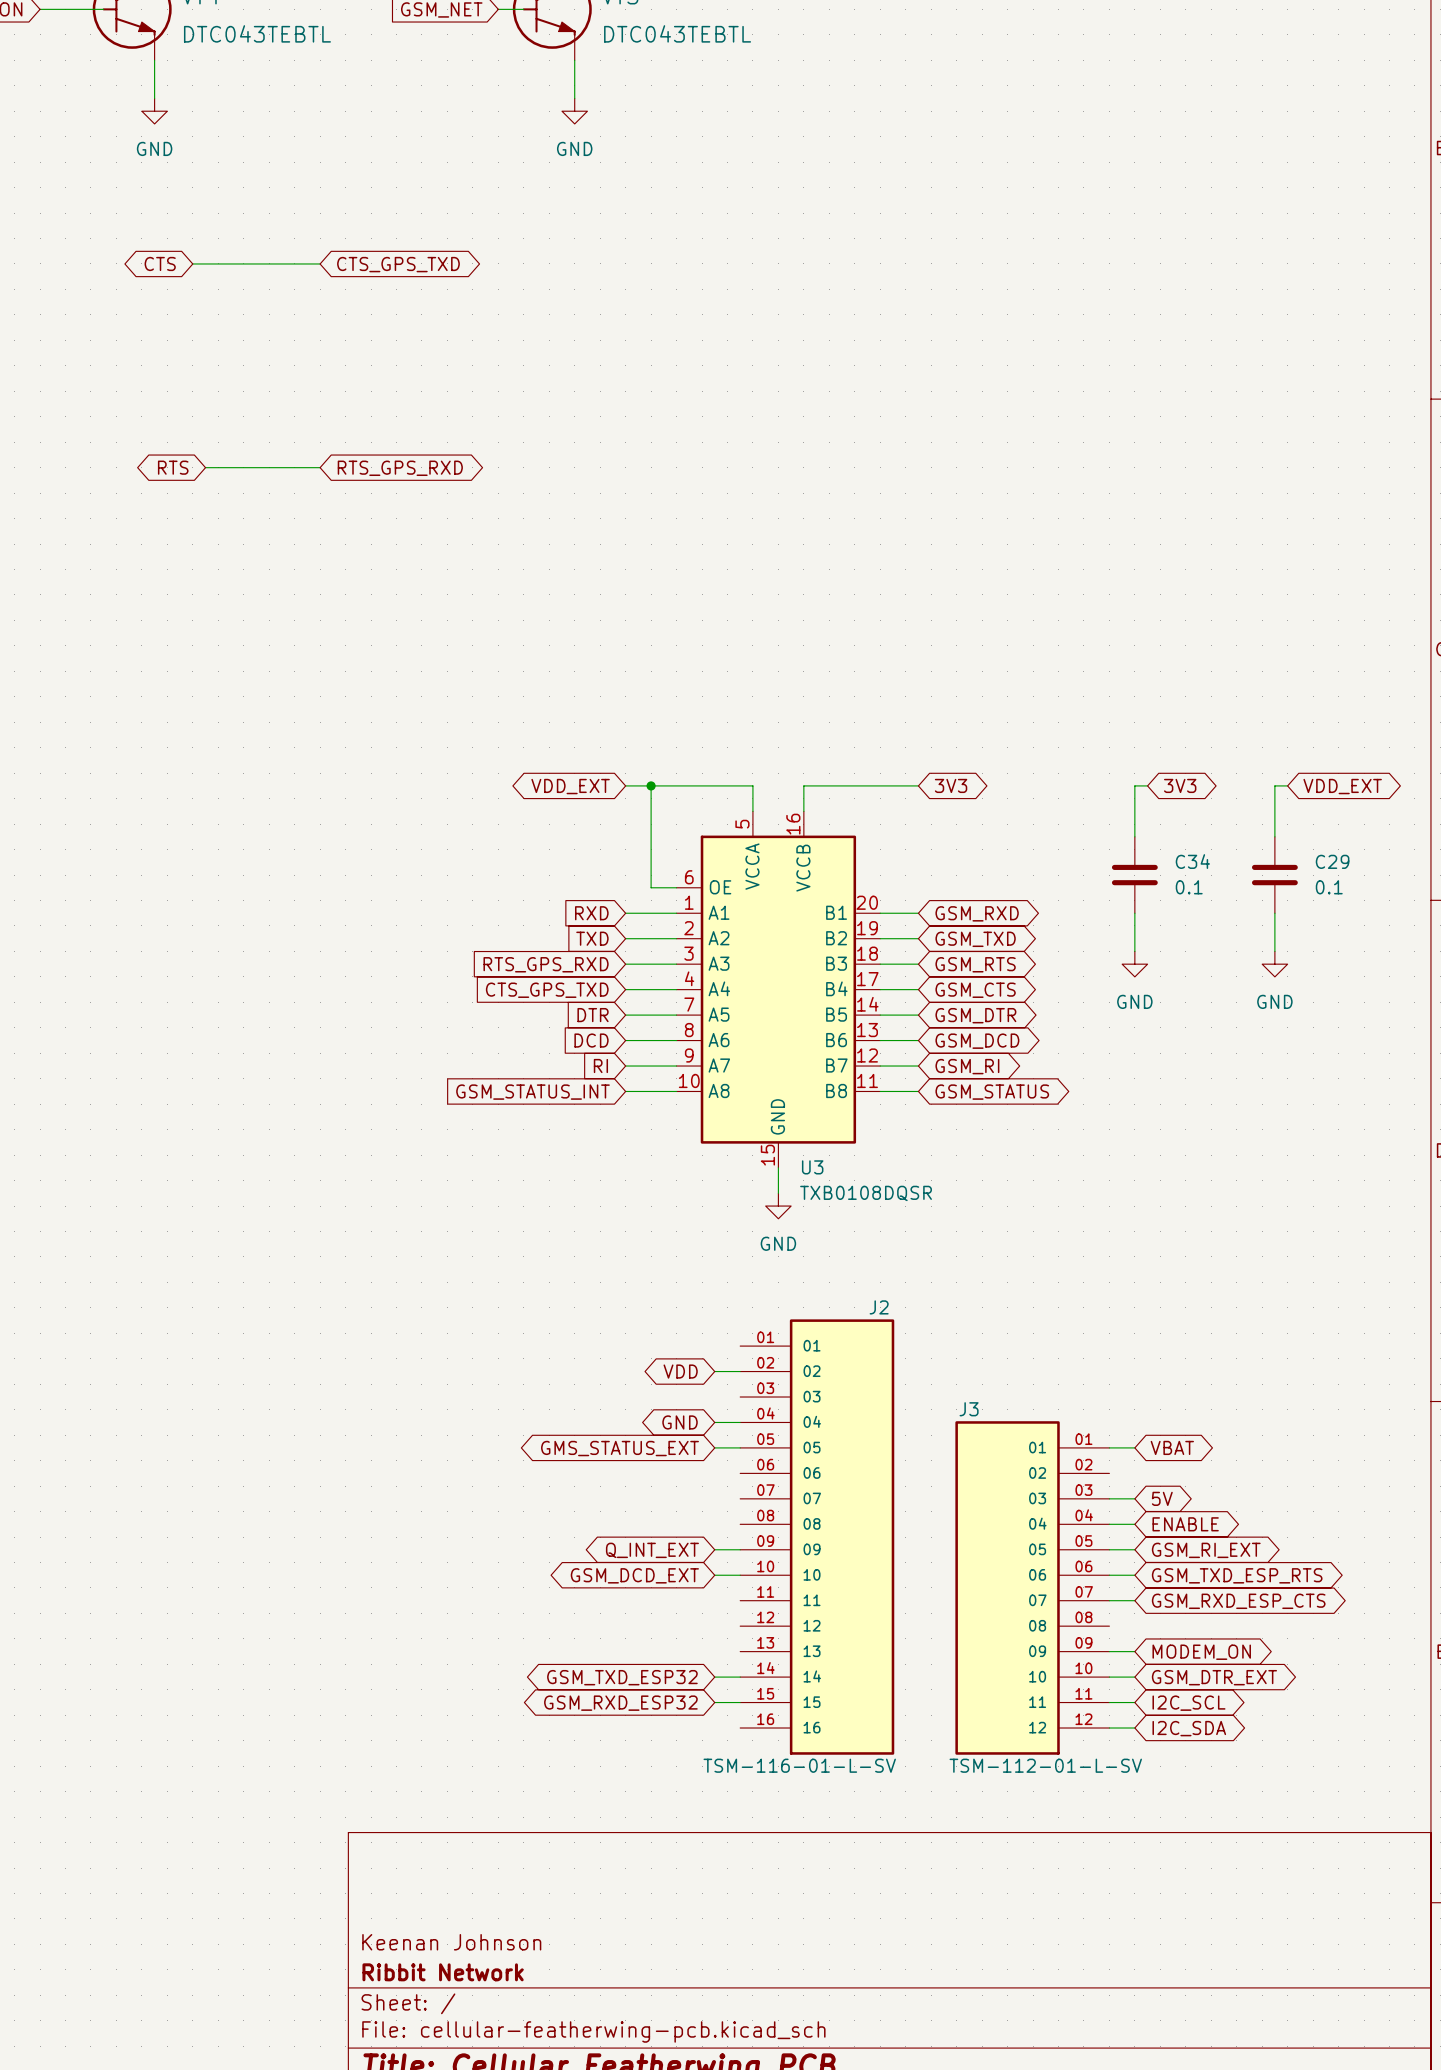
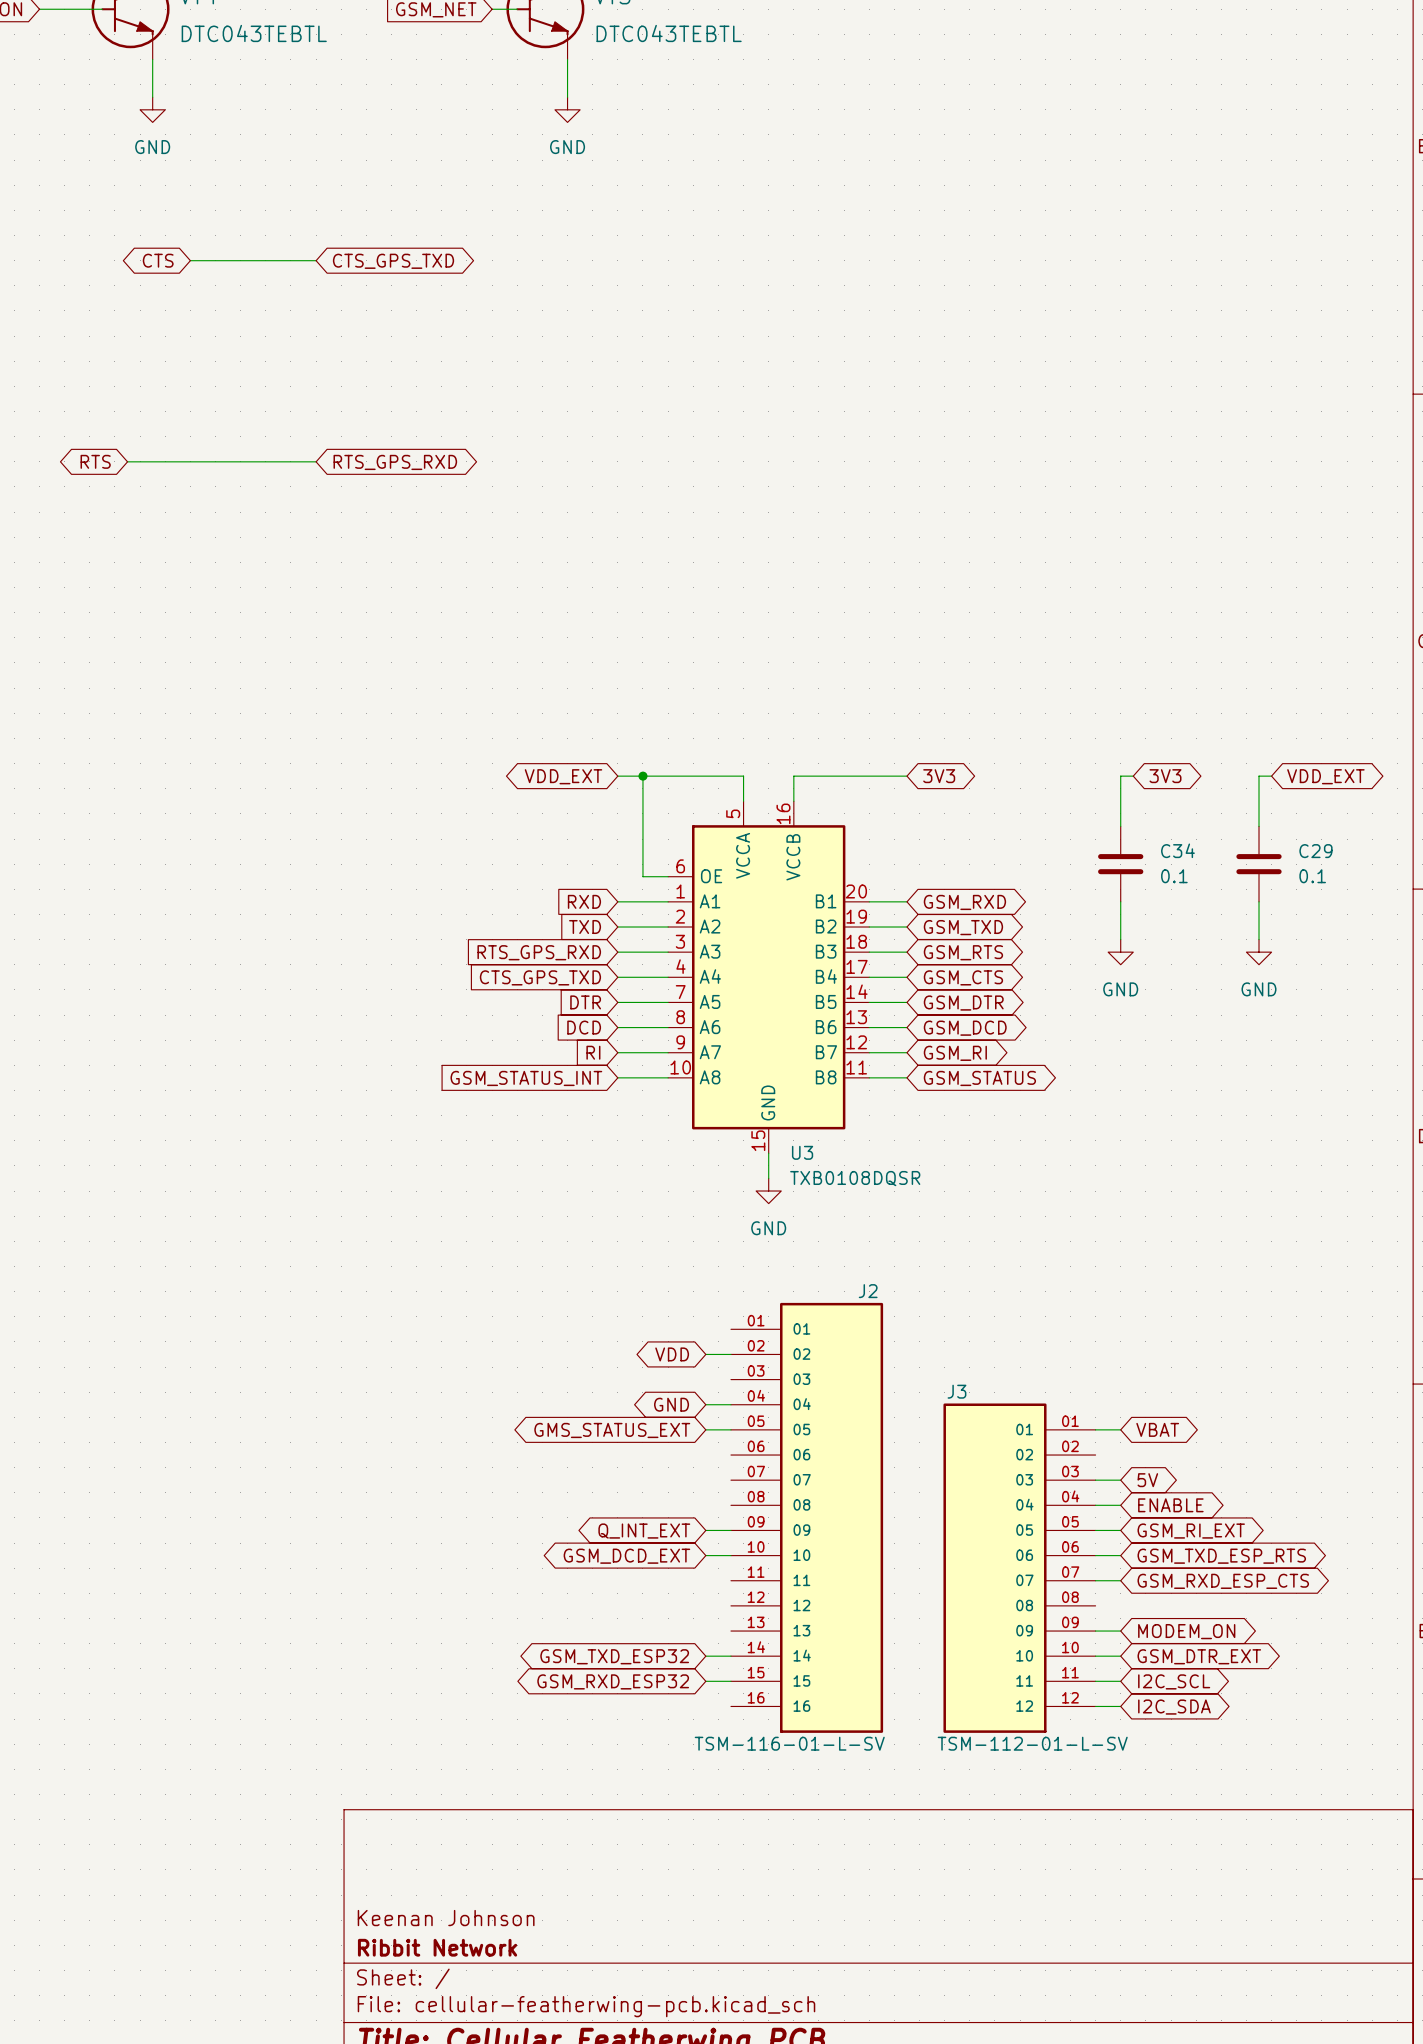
wire: none -> (127, 461) (202, 461)
global label position: RTS (173, 467) -> RTS (95, 461)

